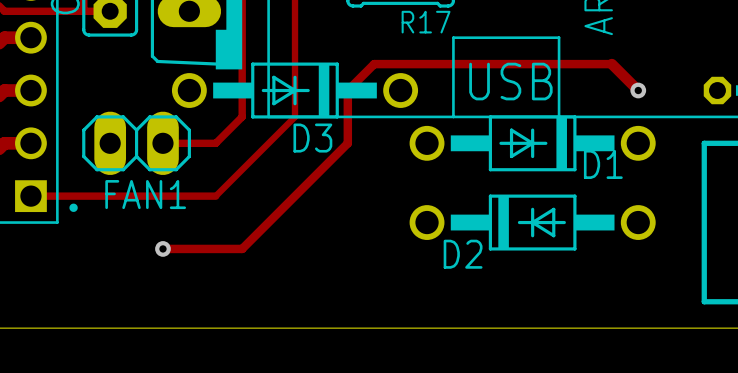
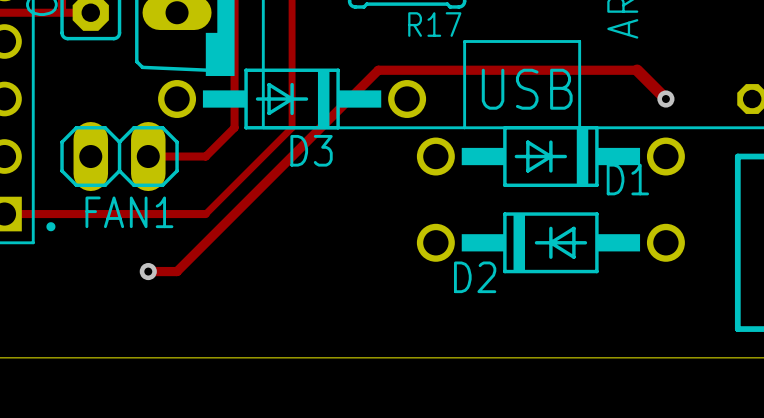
track: (347, 90) (347, 143) (242, 248) (189, 248) -> (349, 99) (177, 271)

